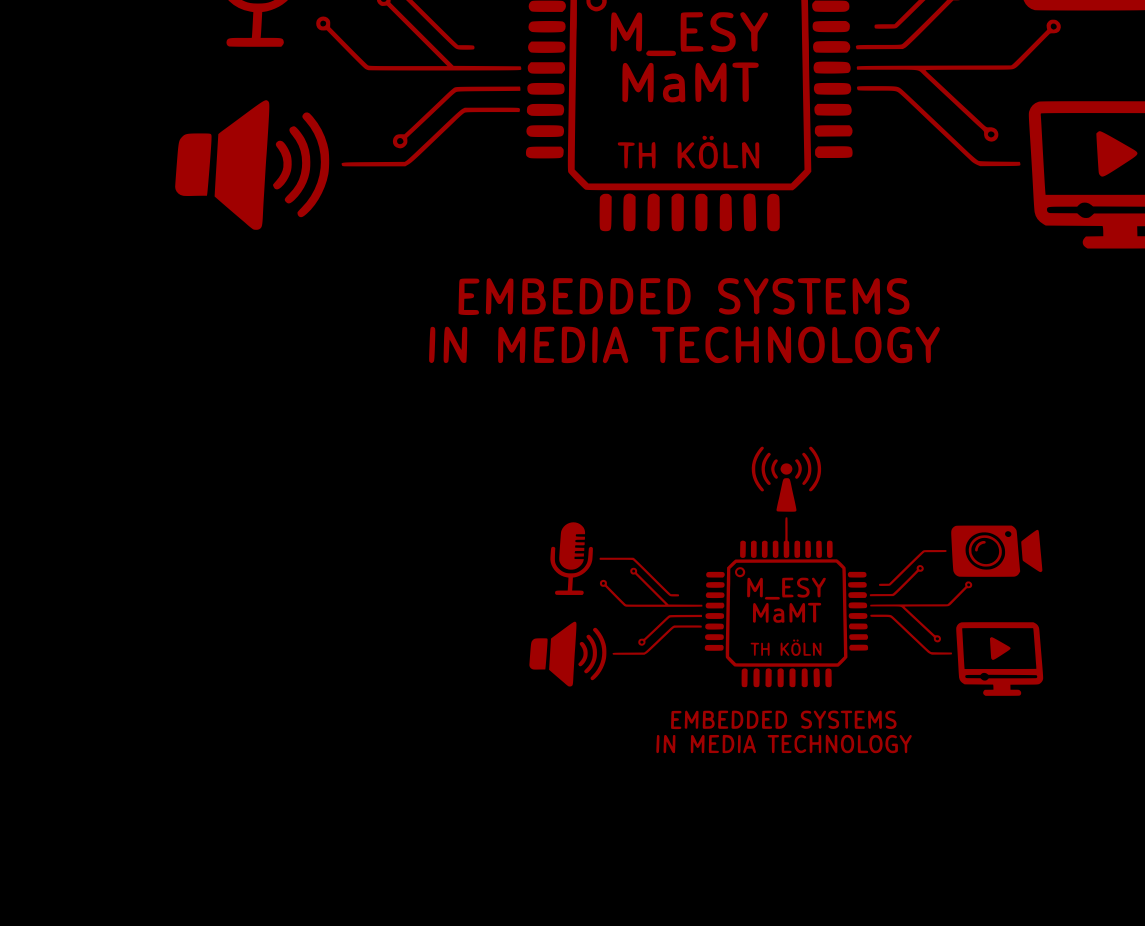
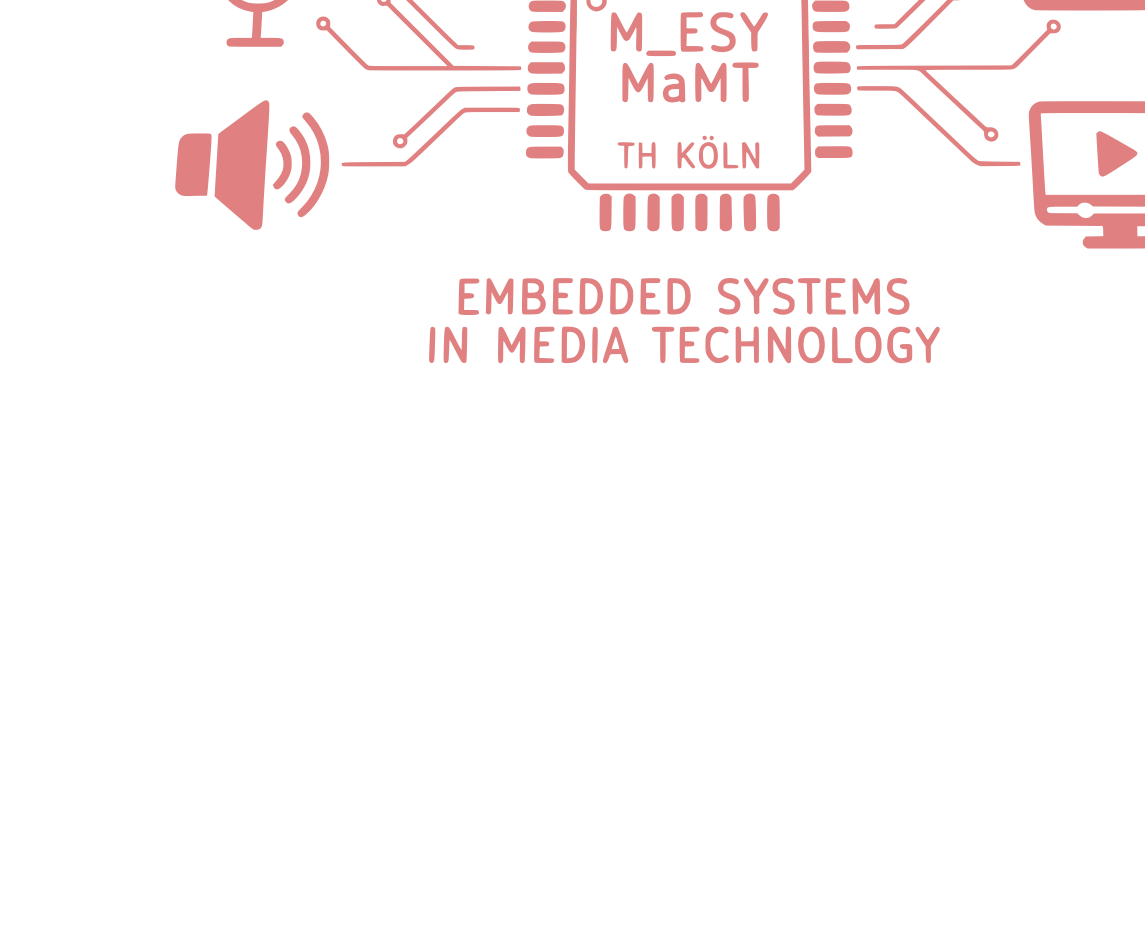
drawing: [529, 446, 1044, 754] -> none

